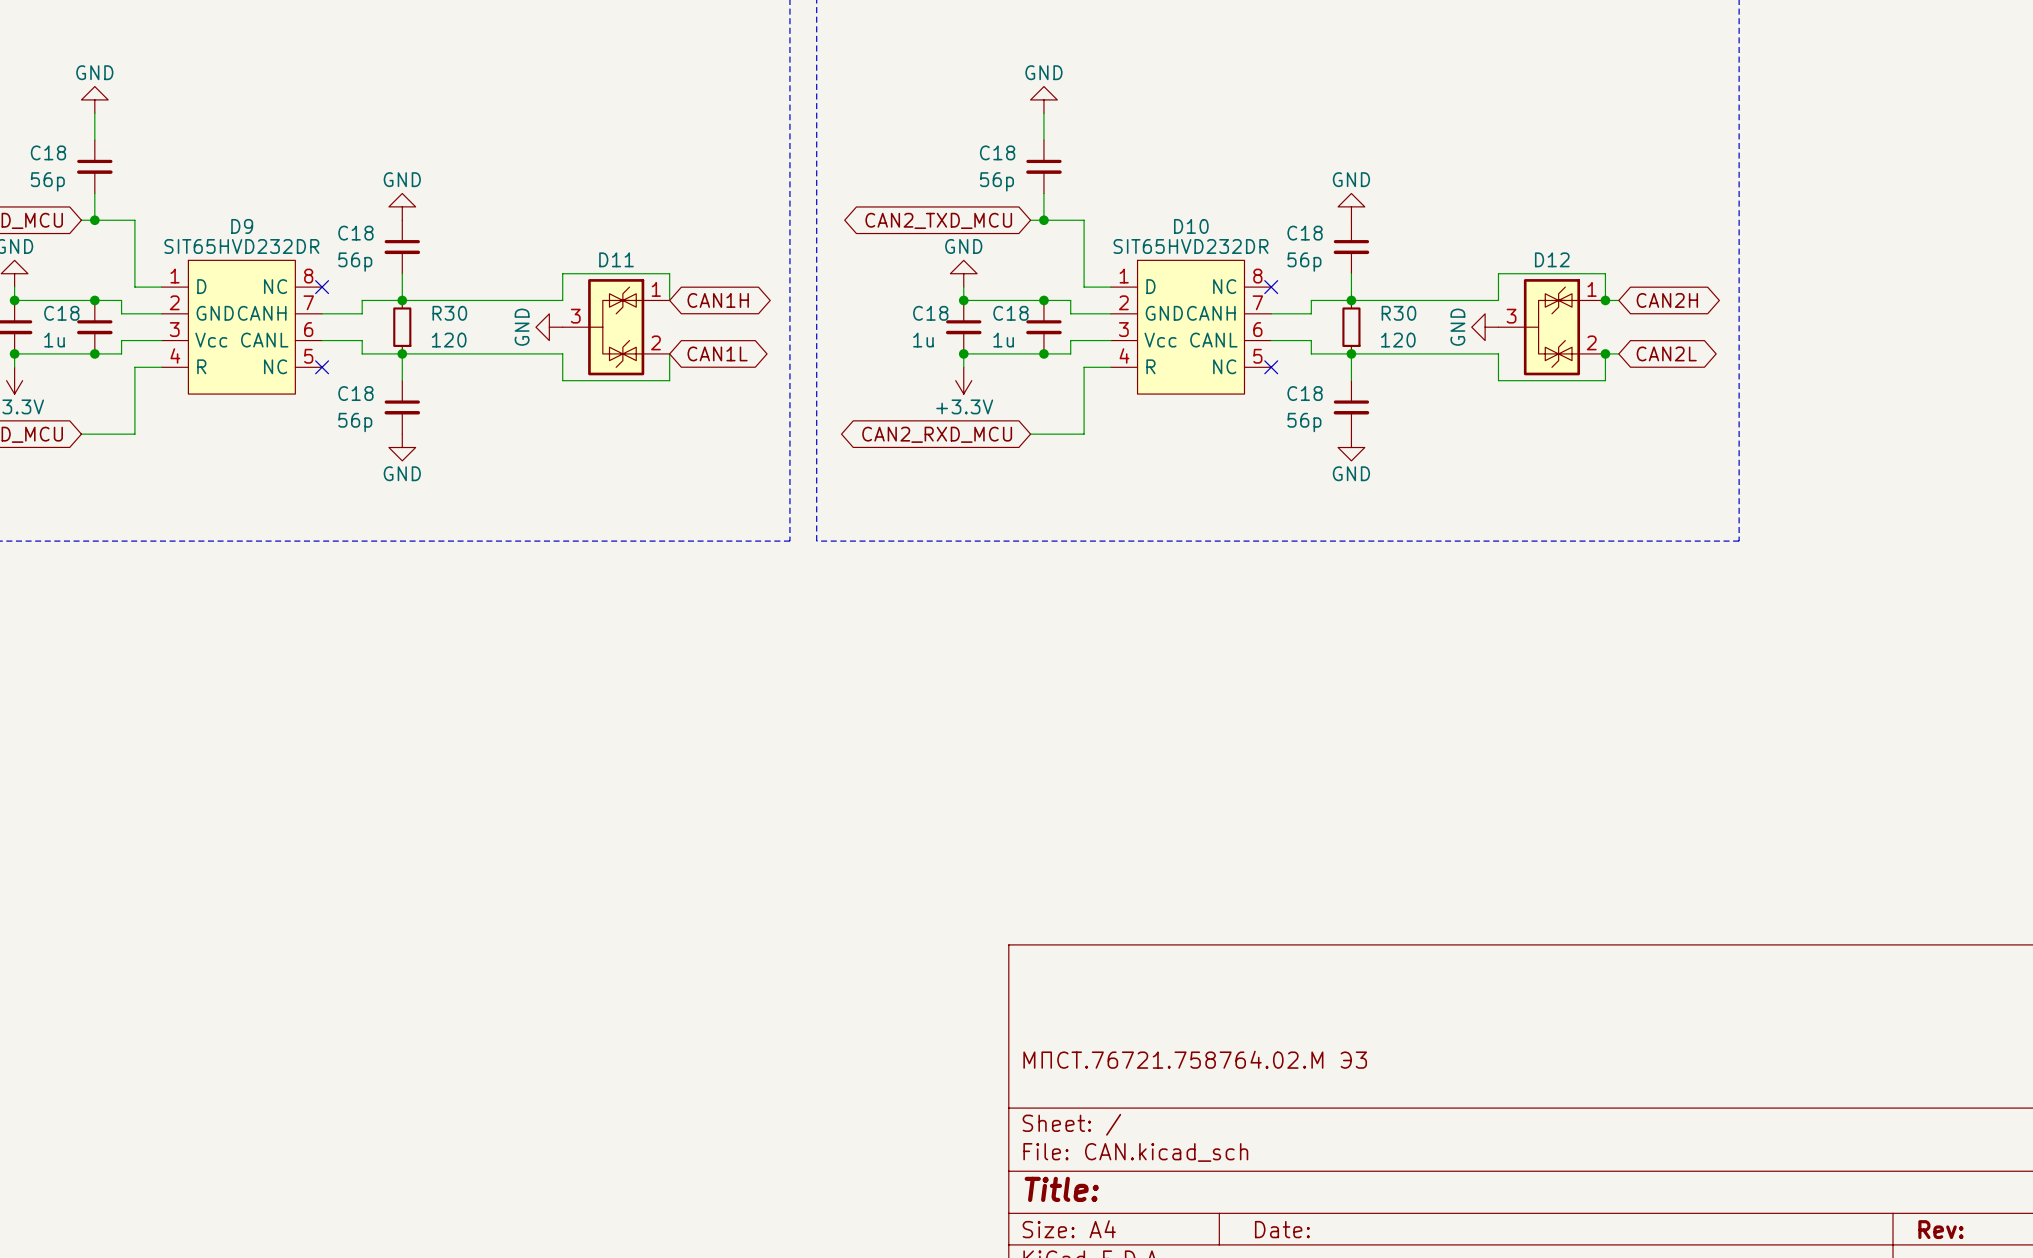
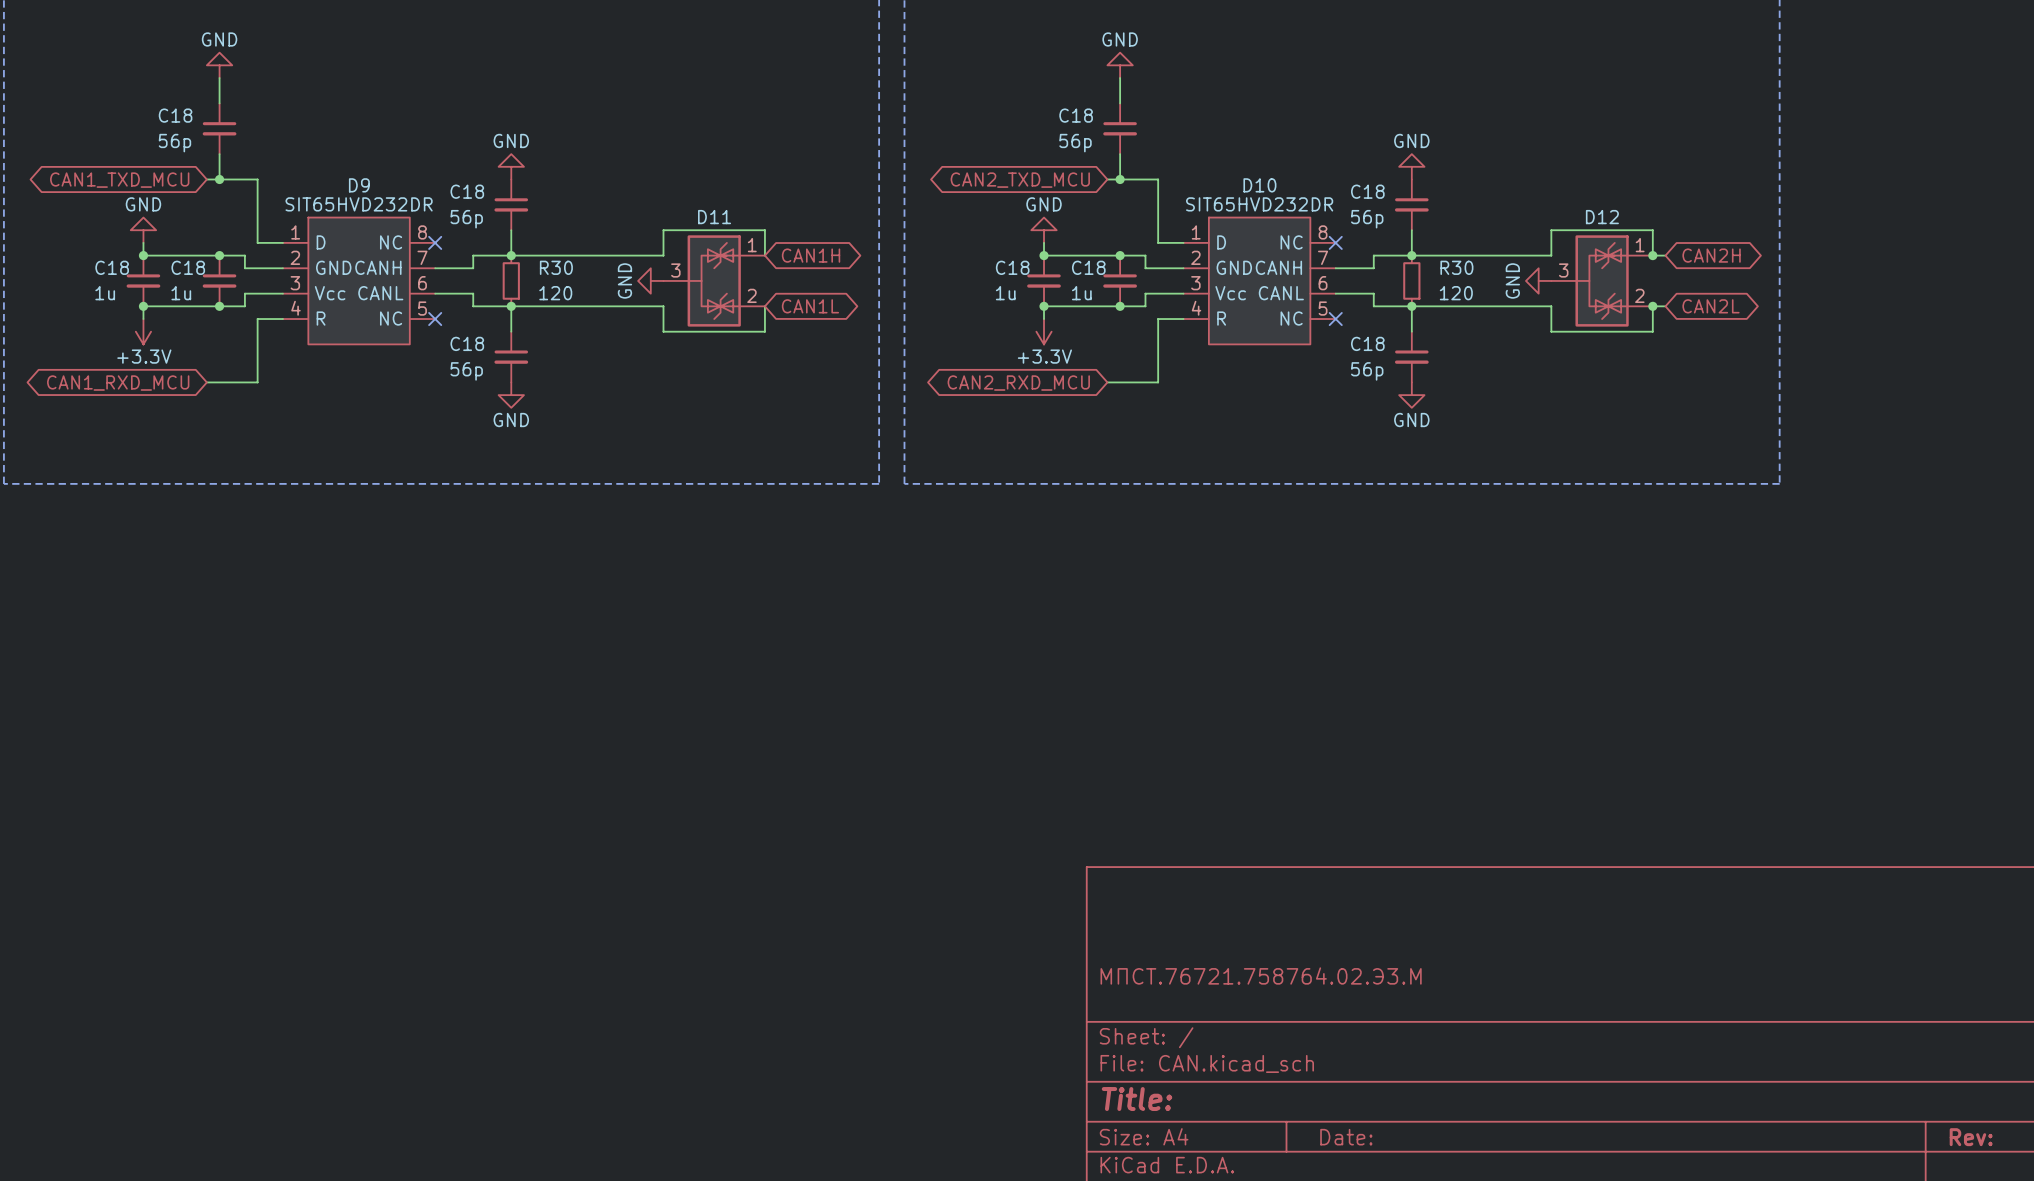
title block: МПСТ.76721.758764.02.М Э3 (1195, 1059) -> МПСТ.76721.758764.02.Э3.М (1261, 976)

